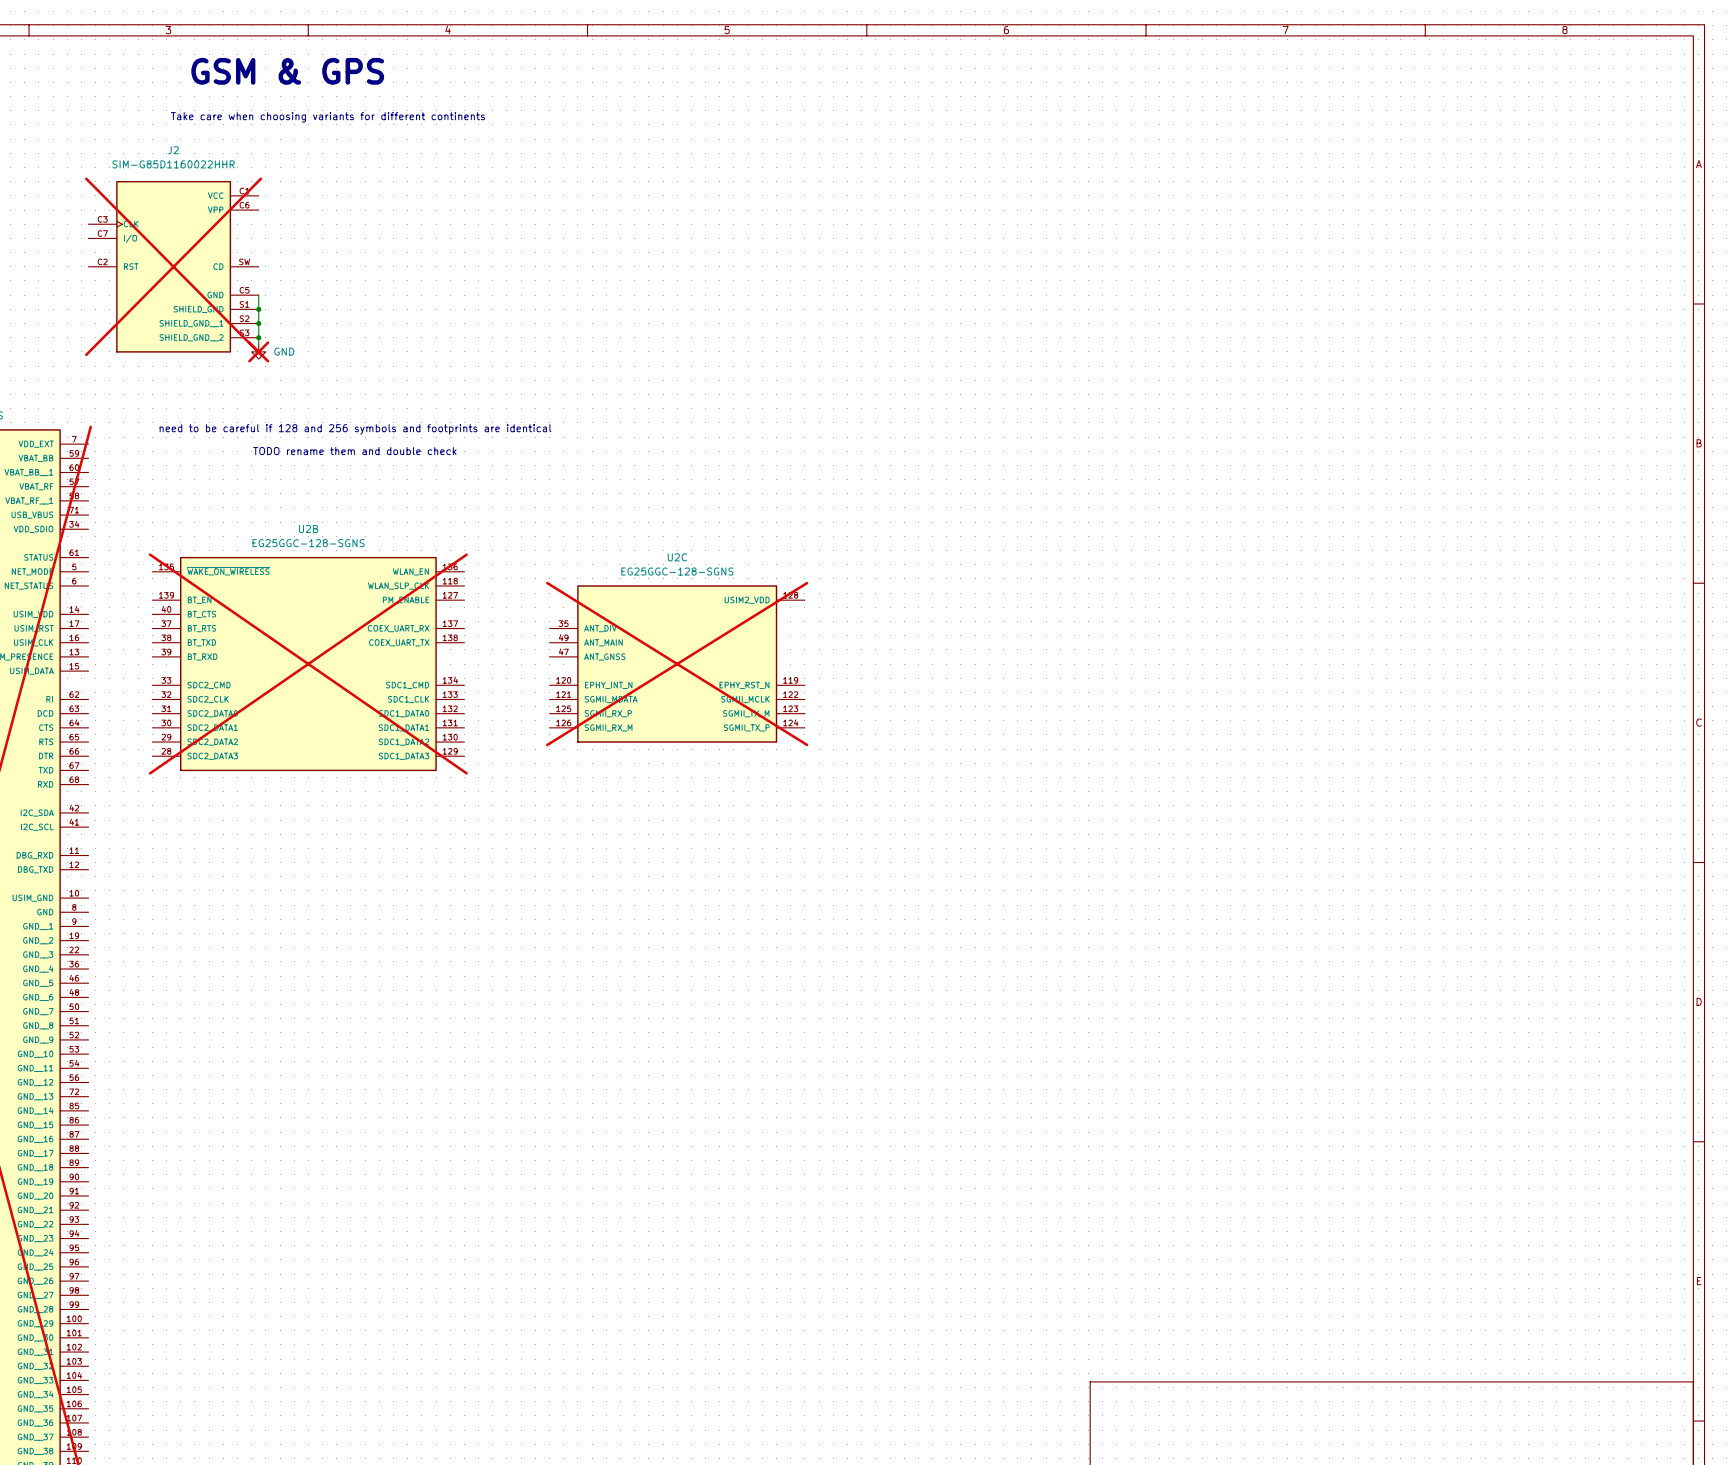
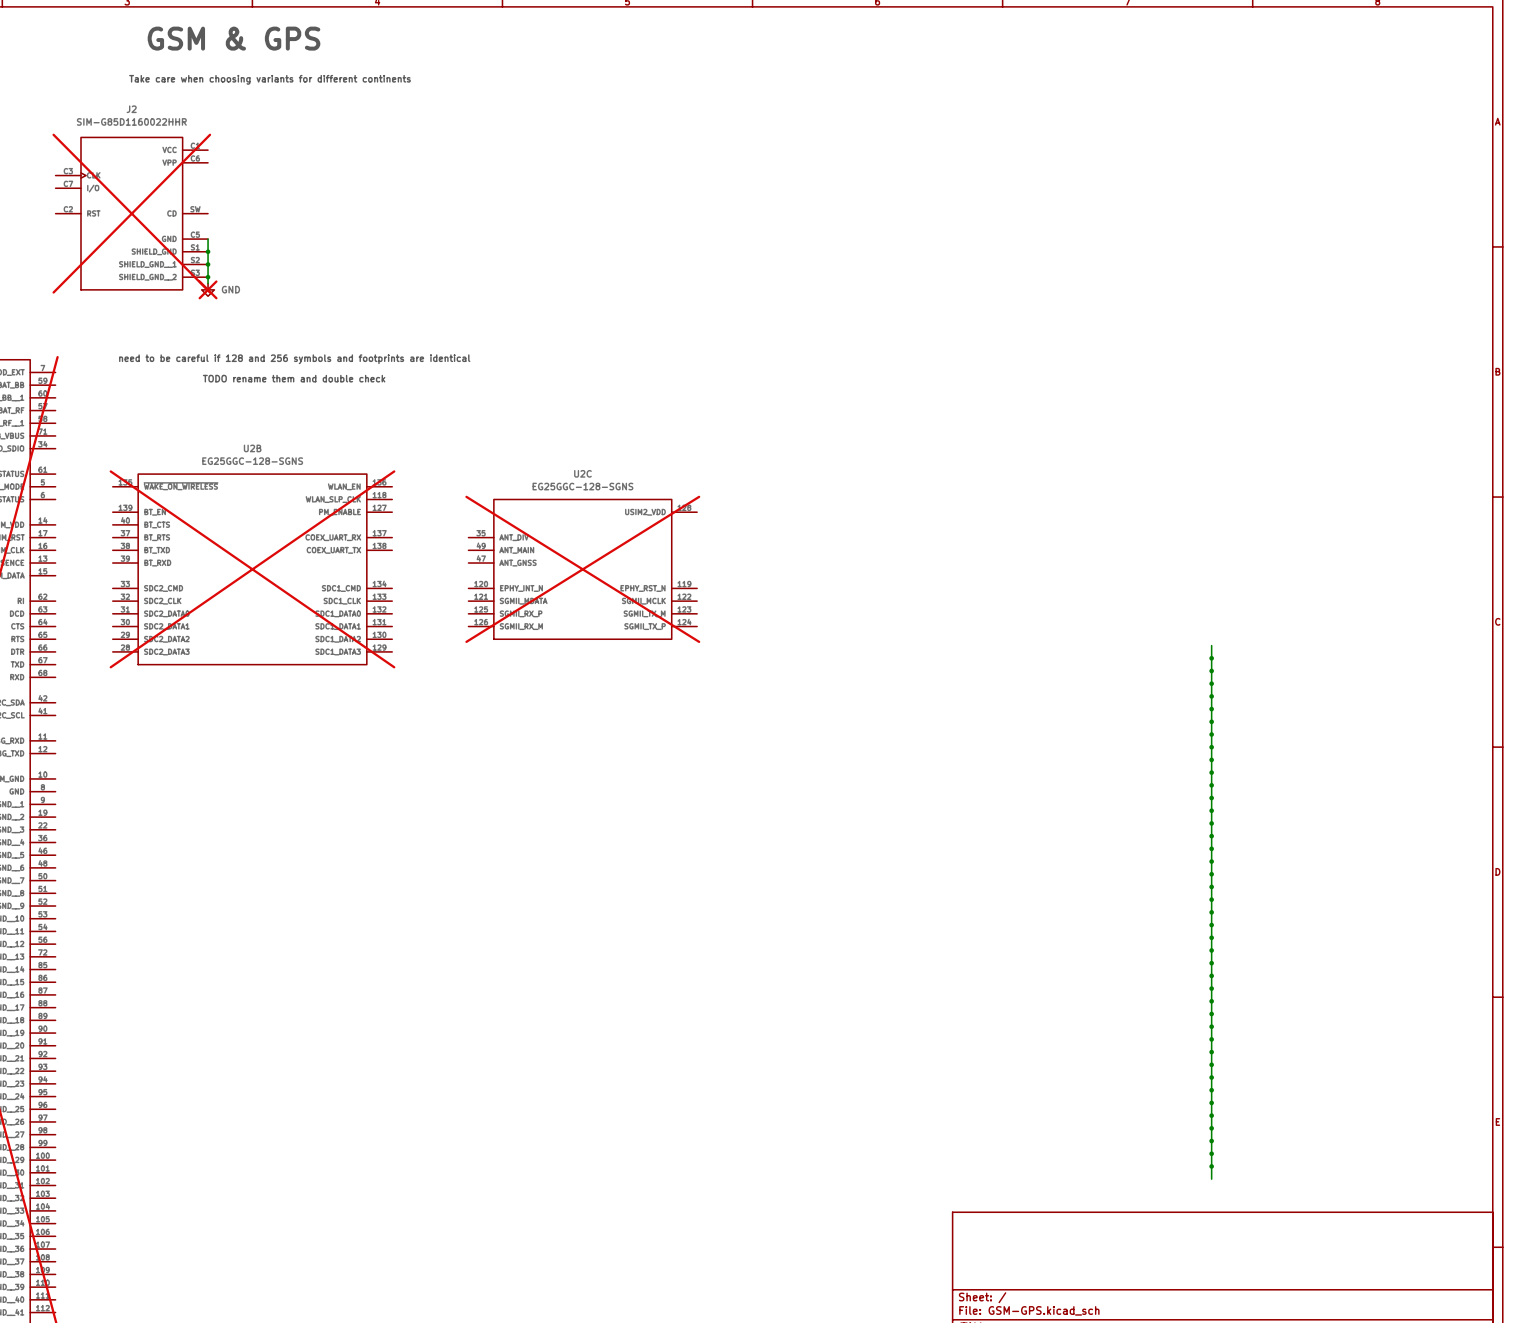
wire: none -> (1211, 645) (1211, 1179)
junction: none -> (1211, 658)
junction: none -> (1211, 670)
junction: none -> (1211, 683)
junction: none -> (1211, 696)
junction: none -> (1211, 709)
junction: none -> (1211, 721)
junction: none -> (1211, 734)
junction: none -> (1211, 747)
junction: none -> (1211, 759)
junction: none -> (1211, 772)
junction: none -> (1211, 785)
junction: none -> (1211, 798)
junction: none -> (1211, 810)
junction: none -> (1211, 823)
junction: none -> (1211, 836)
junction: none -> (1211, 848)
junction: none -> (1211, 861)
junction: none -> (1211, 874)
junction: none -> (1211, 886)
junction: none -> (1211, 899)
junction: none -> (1211, 912)
junction: none -> (1211, 925)
junction: none -> (1211, 937)
junction: none -> (1211, 950)
junction: none -> (1211, 963)
junction: none -> (1211, 975)
junction: none -> (1211, 988)
junction: none -> (1211, 1001)
junction: none -> (1211, 1013)
junction: none -> (1211, 1026)
junction: none -> (1211, 1039)
junction: none -> (1211, 1052)
junction: none -> (1211, 1064)
junction: none -> (1211, 1077)
junction: none -> (1211, 1090)
junction: none -> (1211, 1102)
junction: none -> (1211, 1115)
junction: none -> (1211, 1128)
junction: none -> (1211, 1141)
junction: none -> (1211, 1153)
junction: none -> (1211, 1166)

